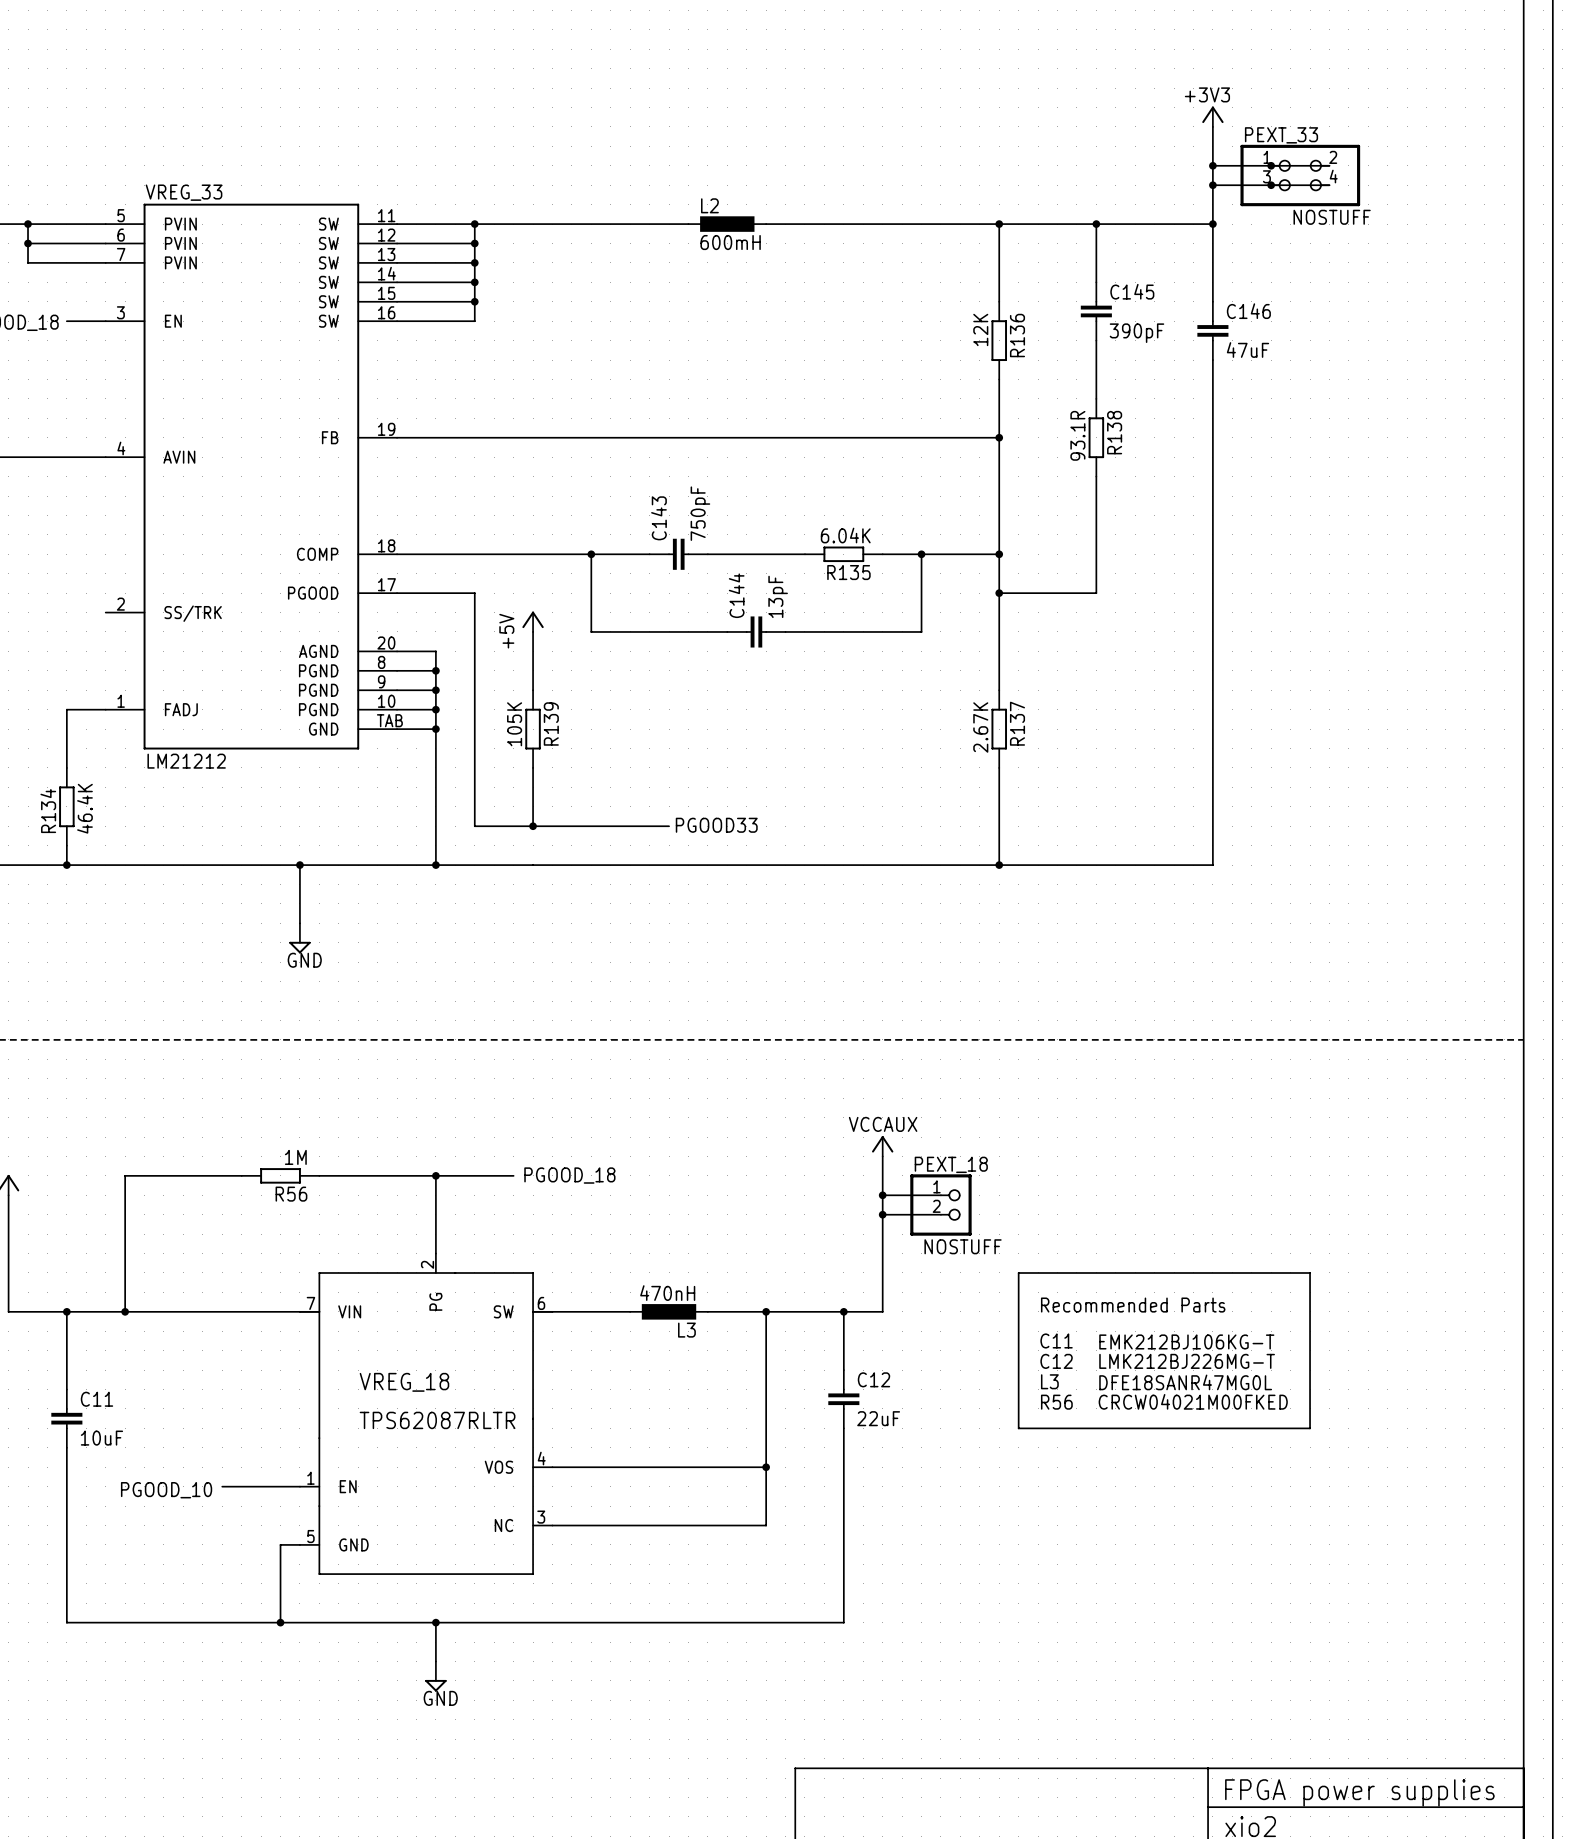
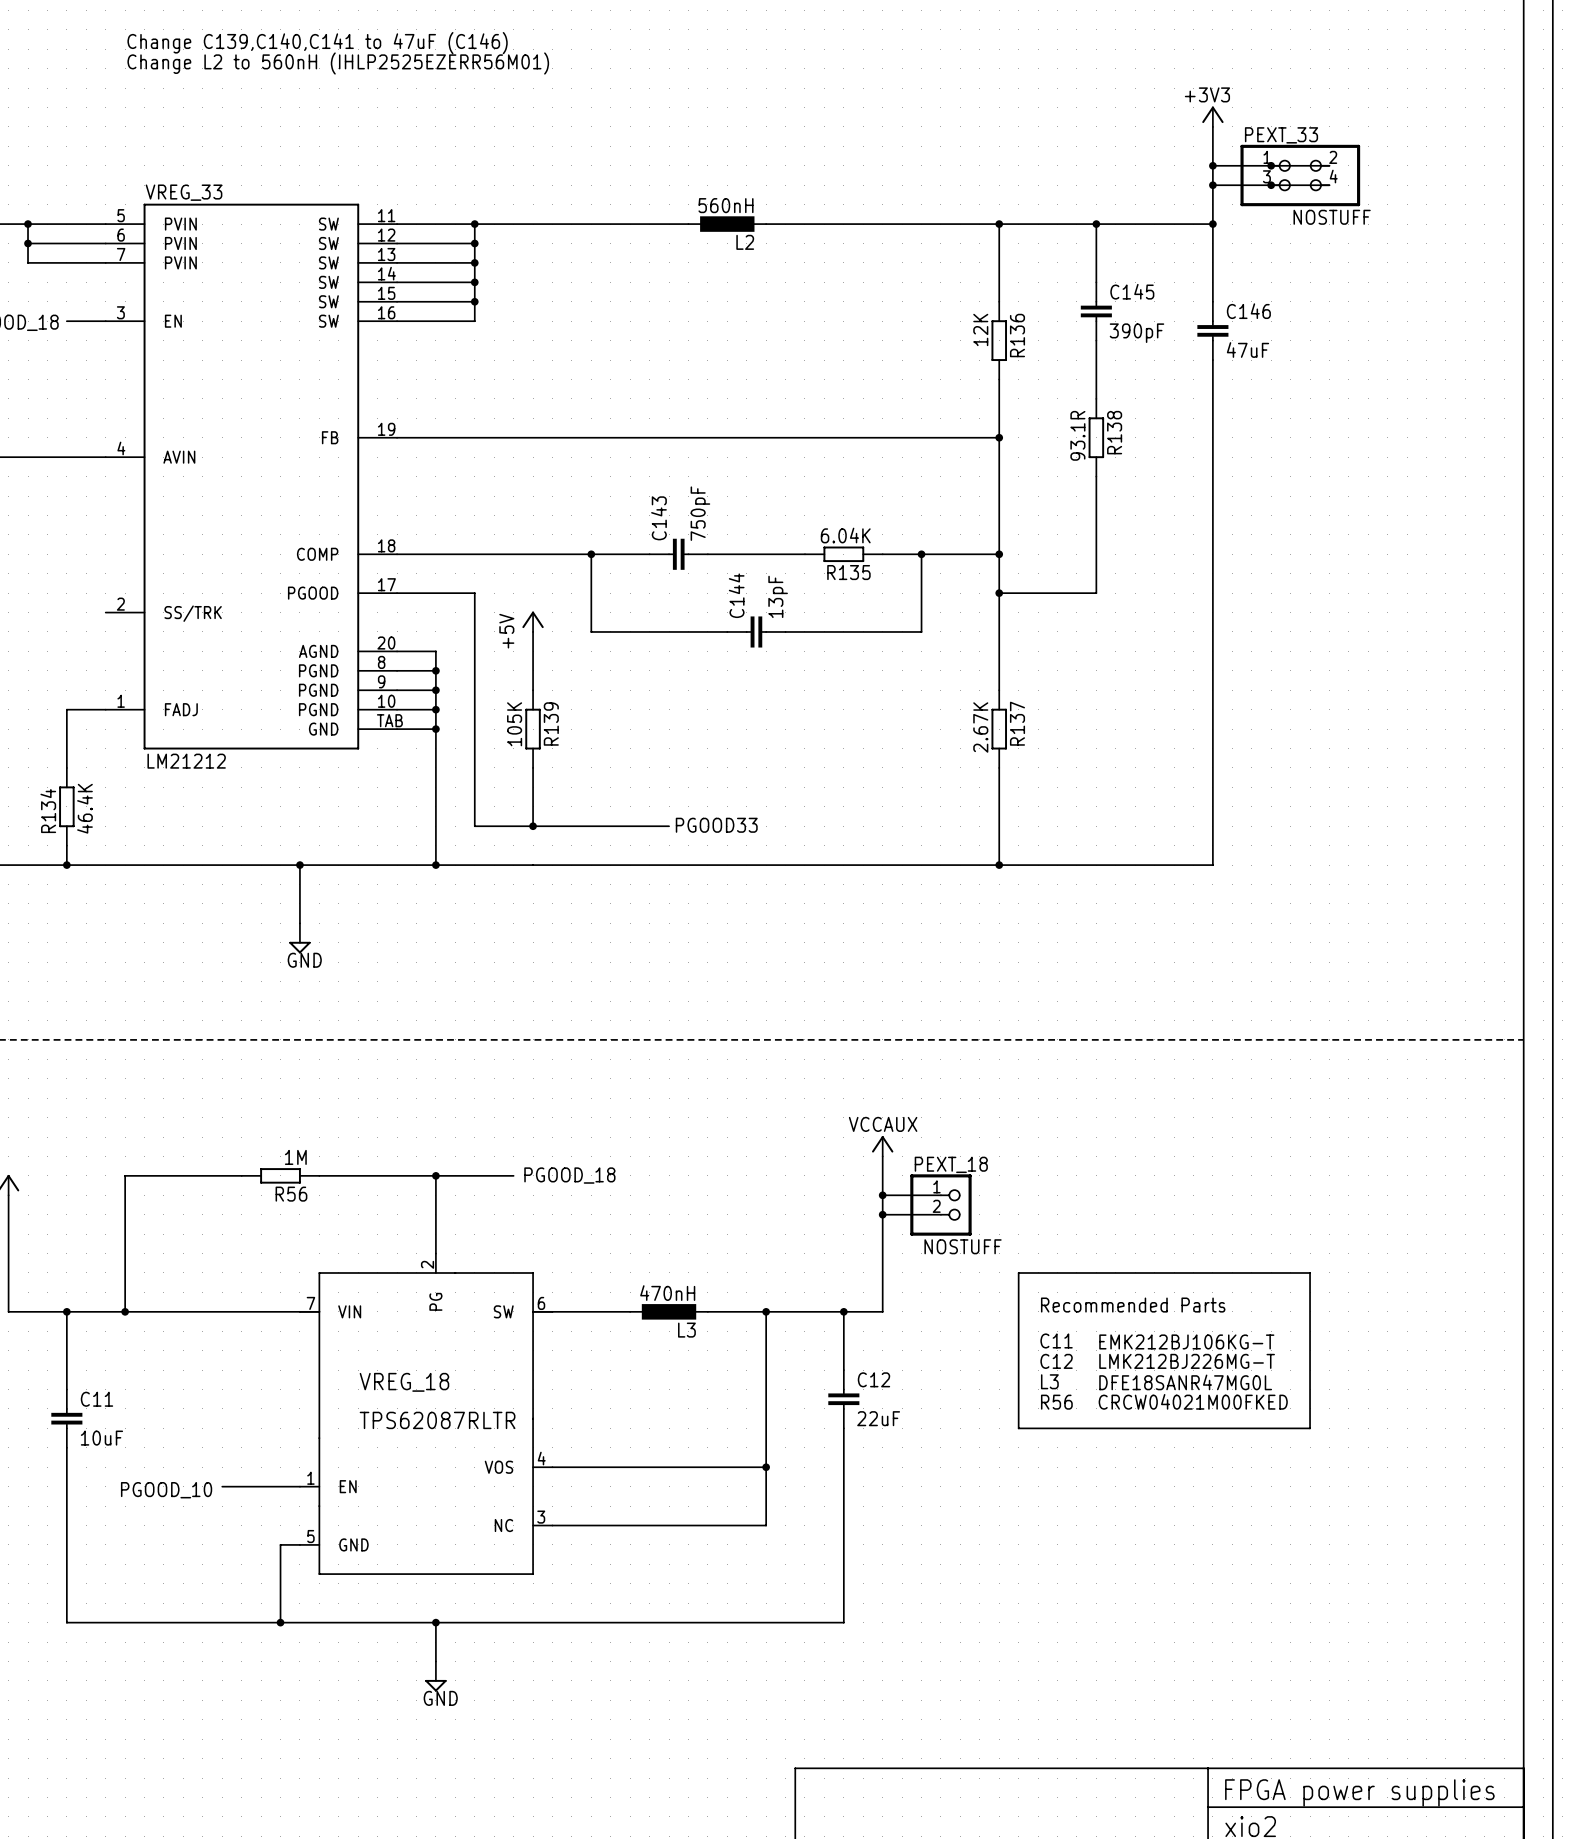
text: none -> Change C139,C140,C141 to 47uF (C146) (317, 43)
text: none -> Change L2 to 560nH (IHLP2525EZERR56M01) (338, 63)
L2 name position: L2 (709, 205) -> L2 (745, 242)
L2 value: 600mH (730, 242) -> 560nH (725, 205)

